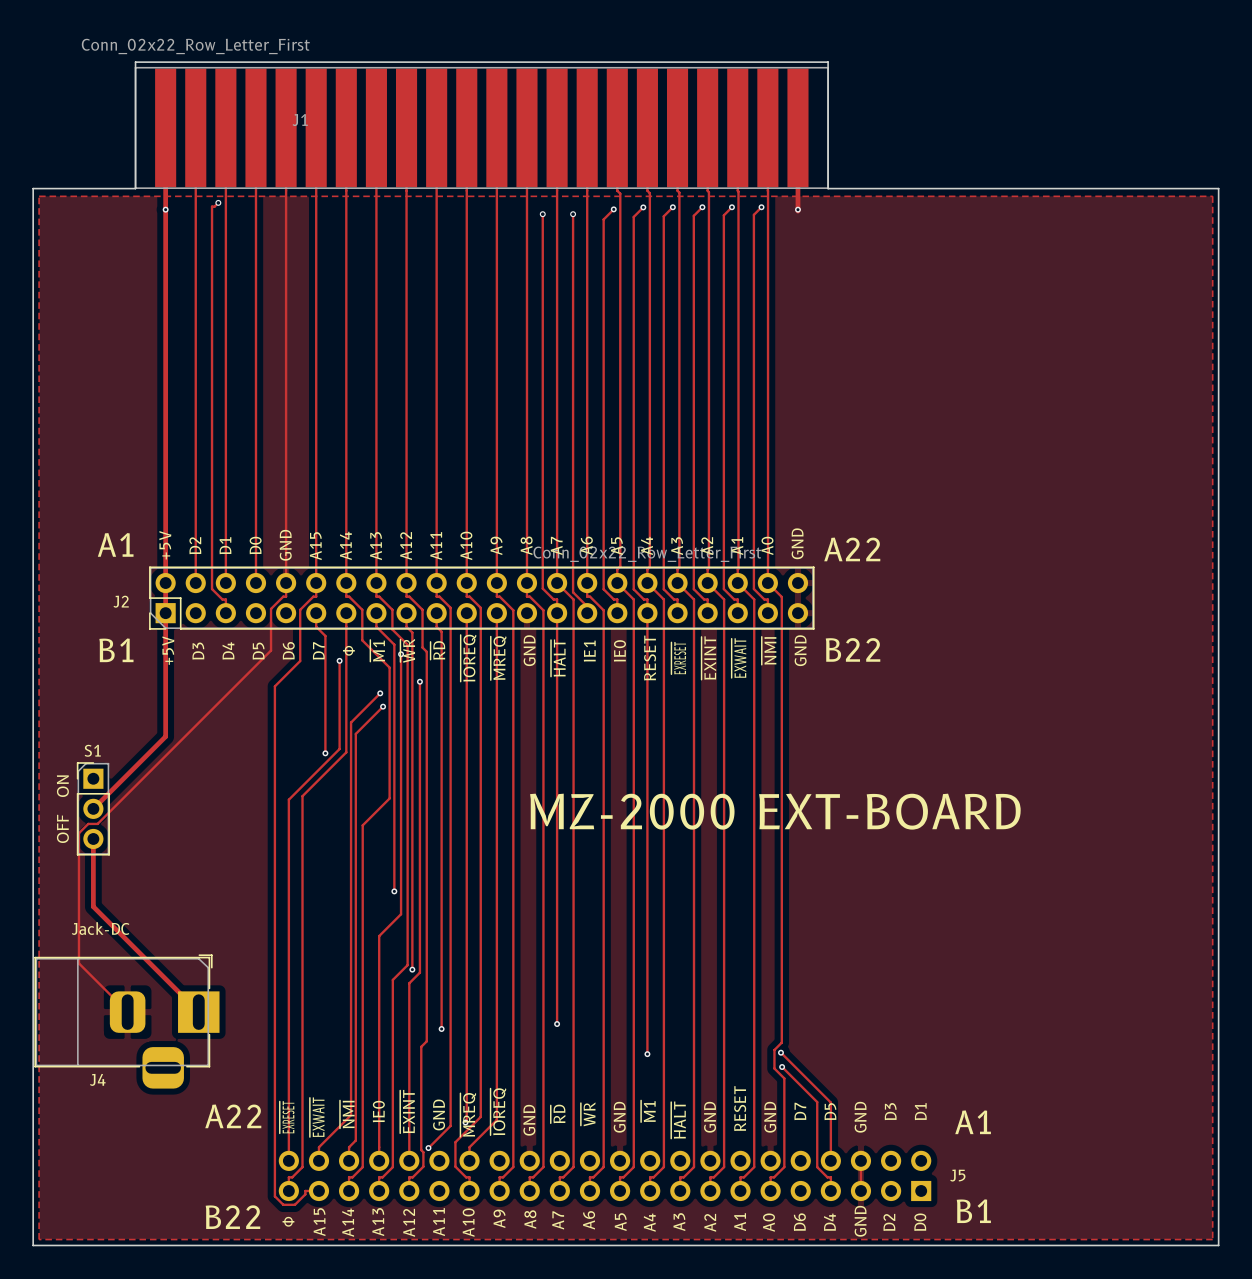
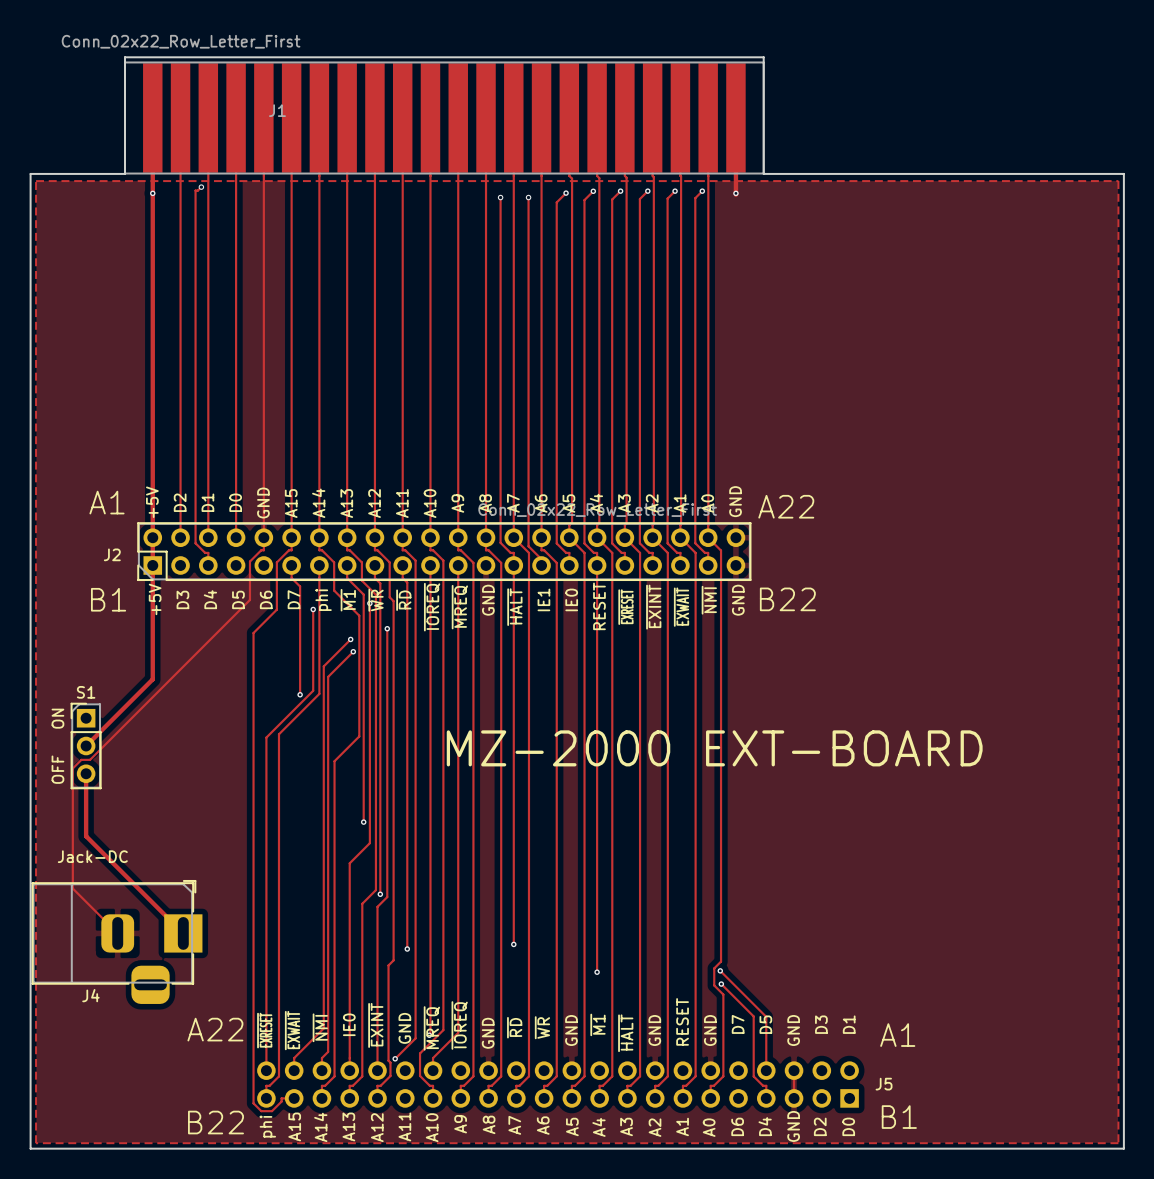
text: Φ (348, 650) -> phi (323, 599)
text: Φ (288, 1221) -> phi (267, 1126)

